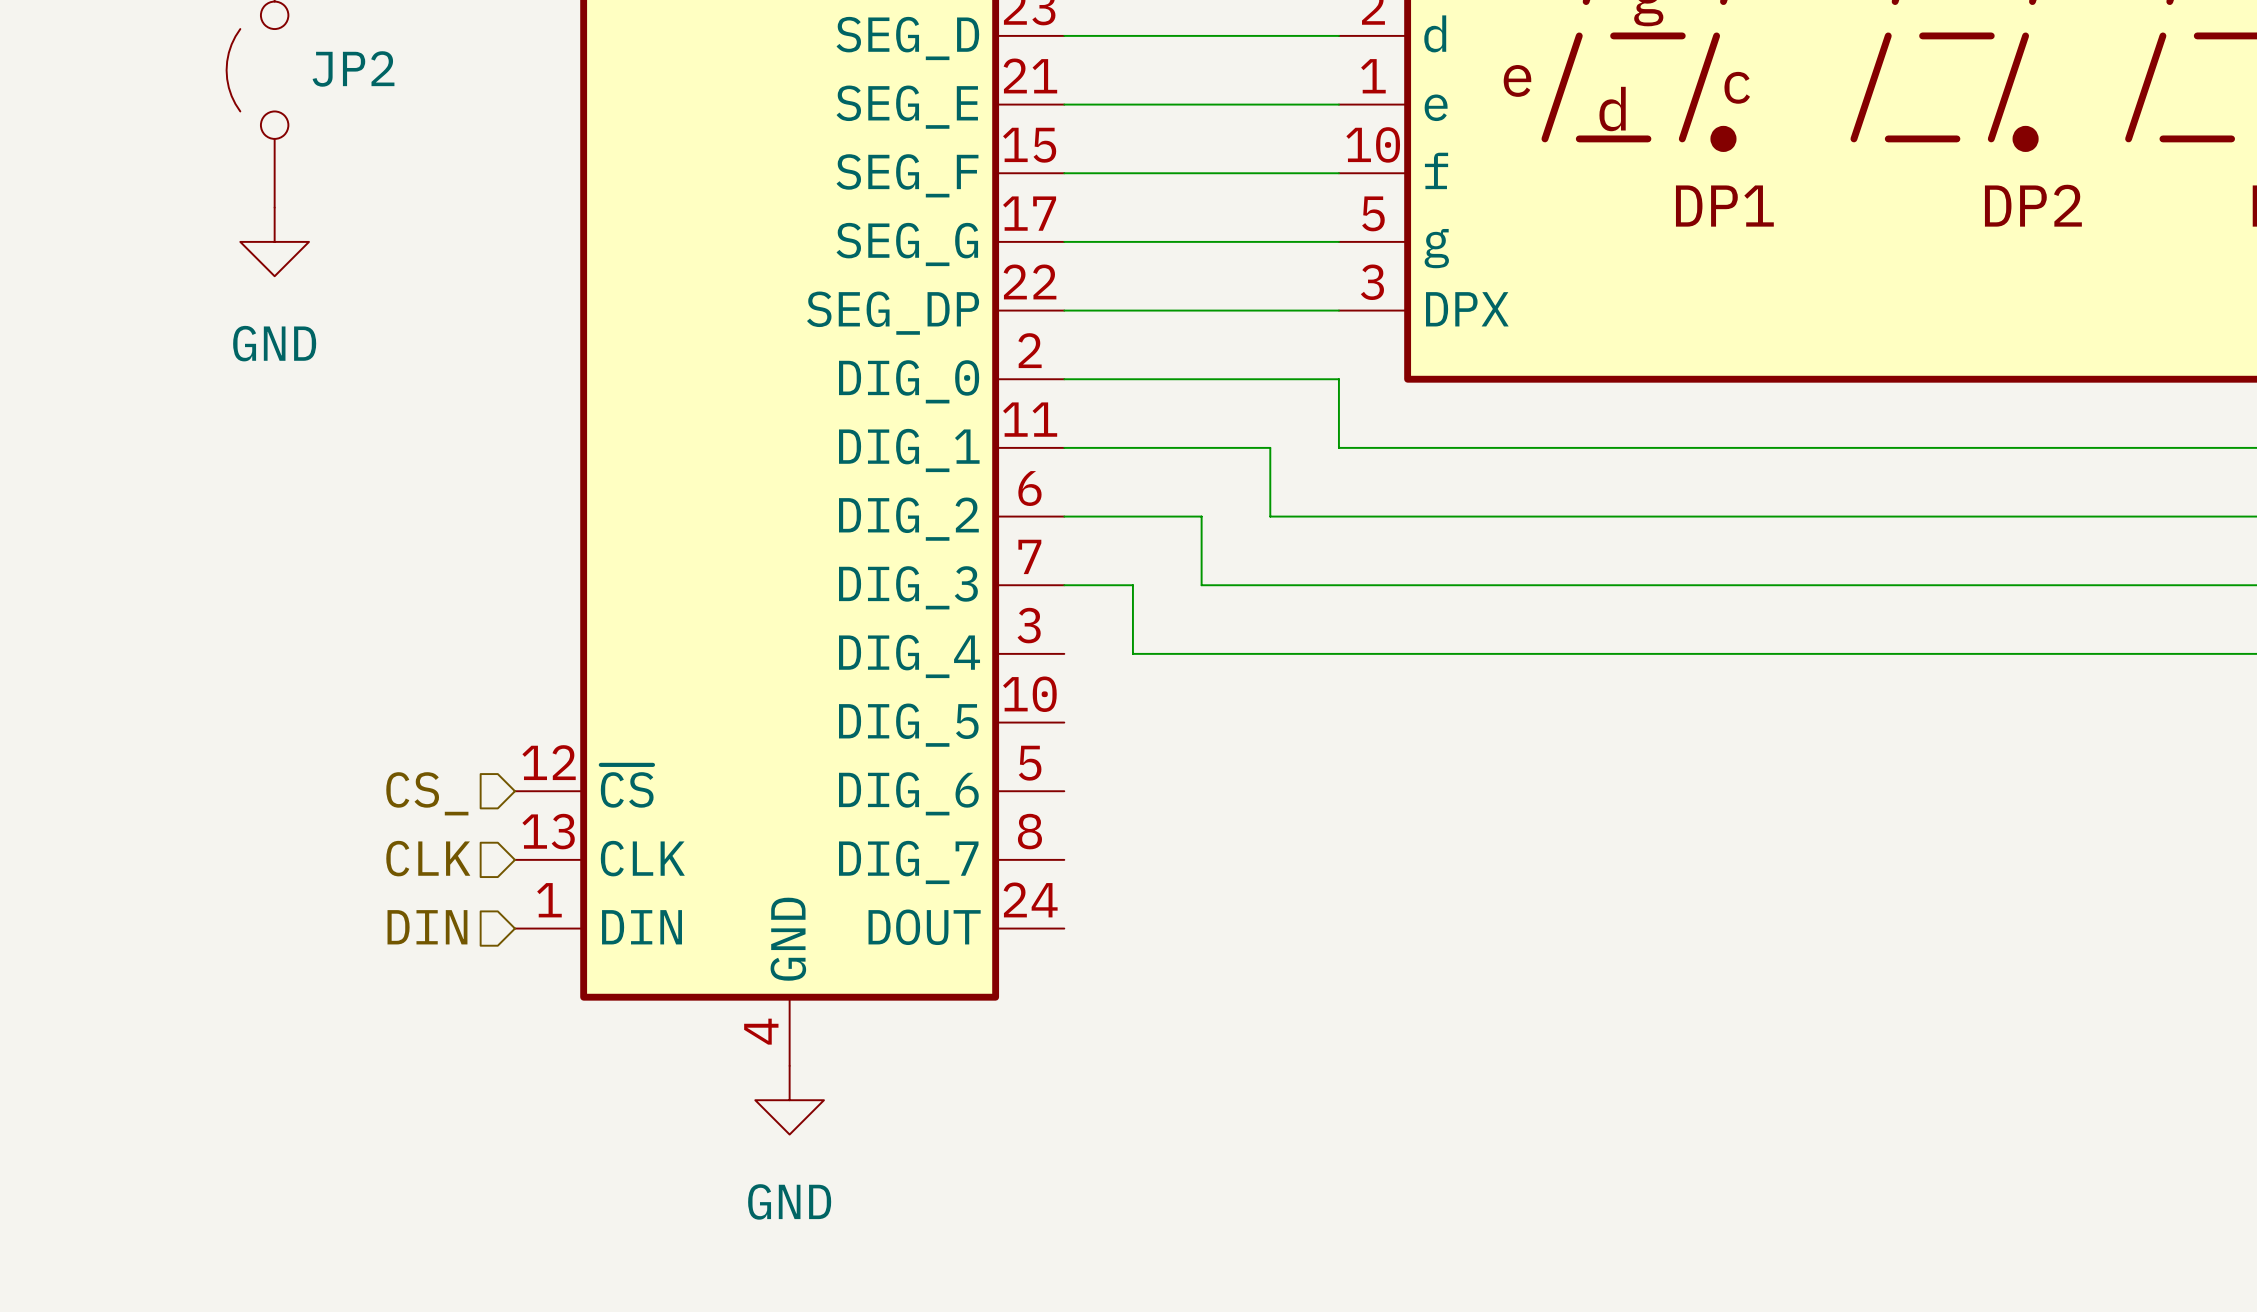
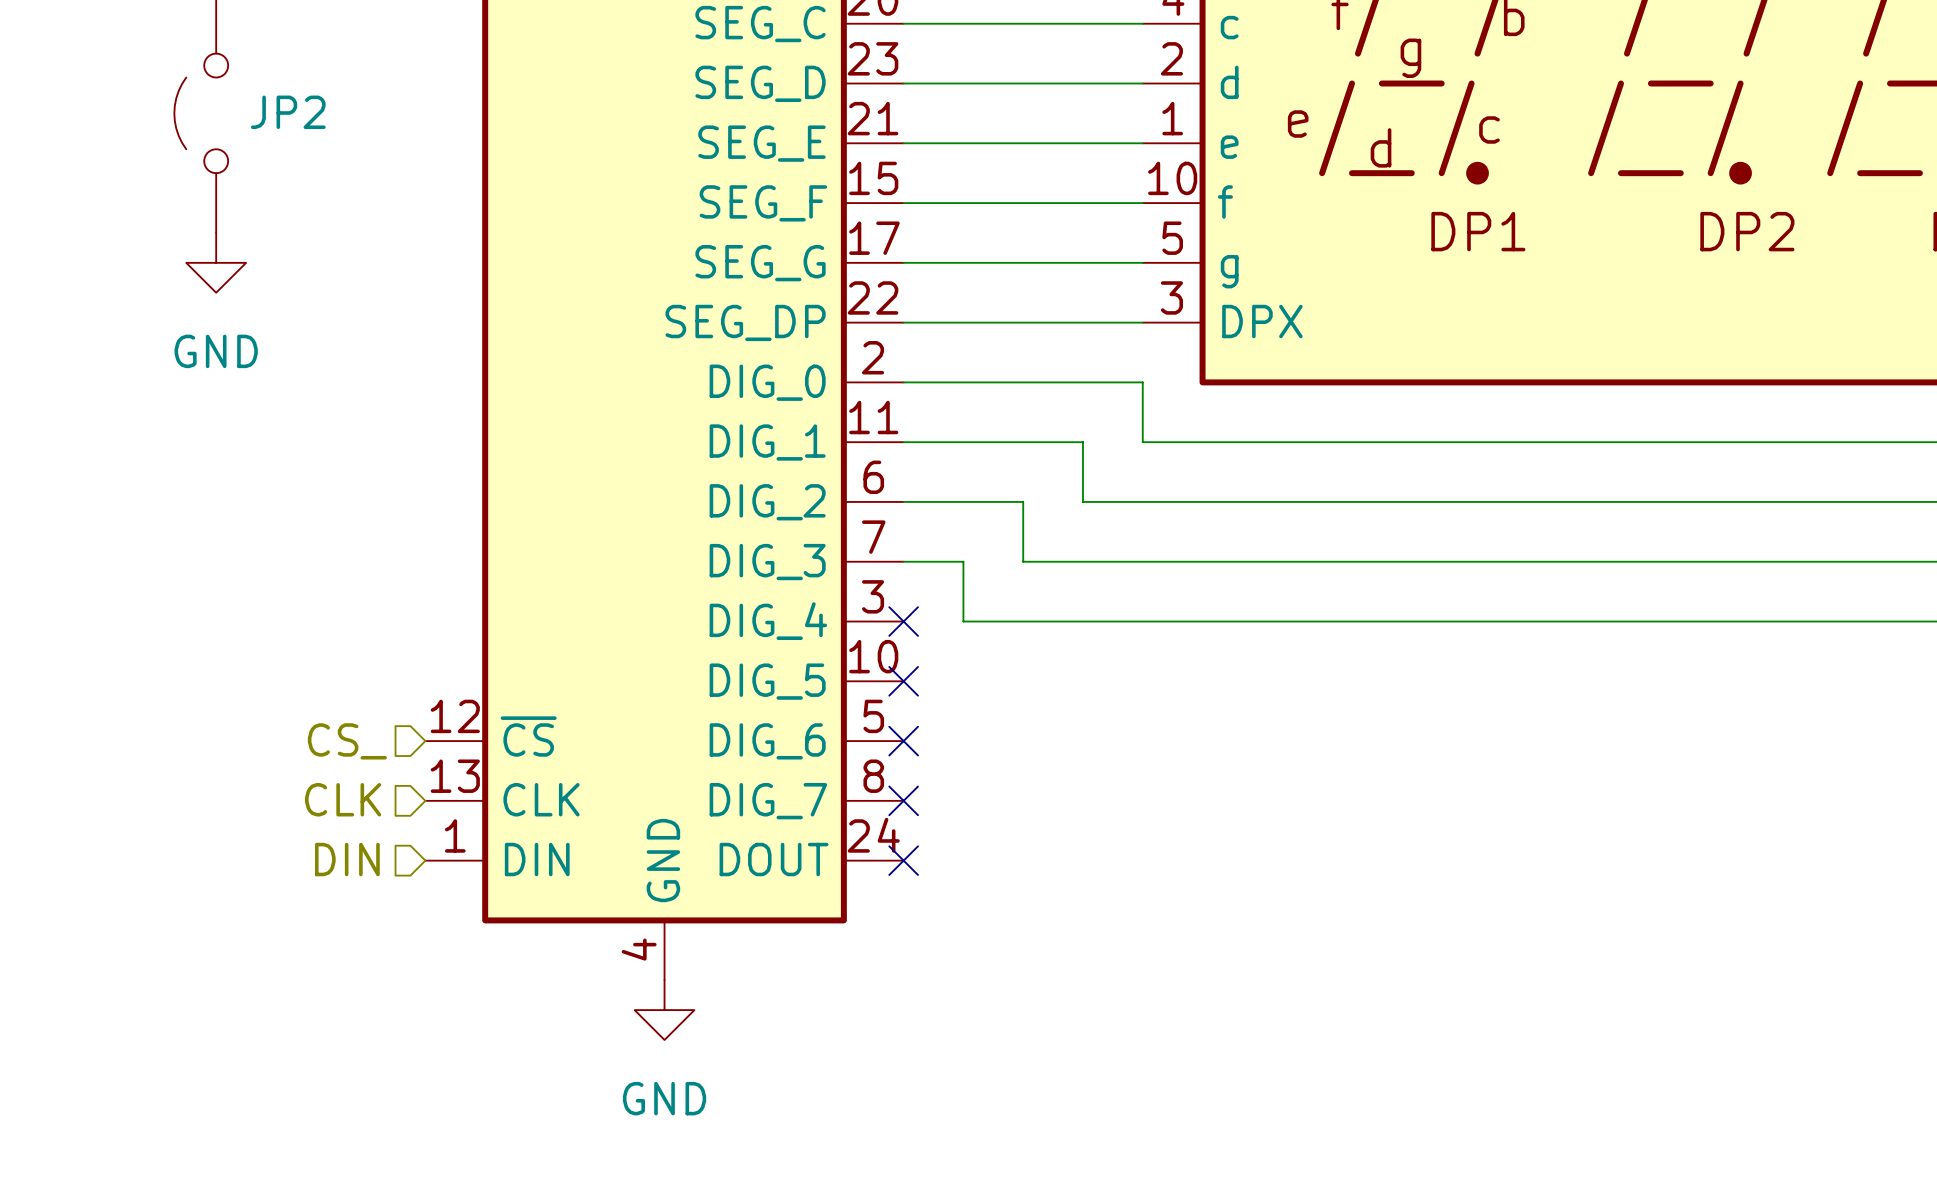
no-connect mark: none -> (903, 621)
no-connect mark: none -> (903, 681)
no-connect mark: none -> (903, 741)
no-connect mark: none -> (903, 800)
no-connect mark: none -> (903, 860)

